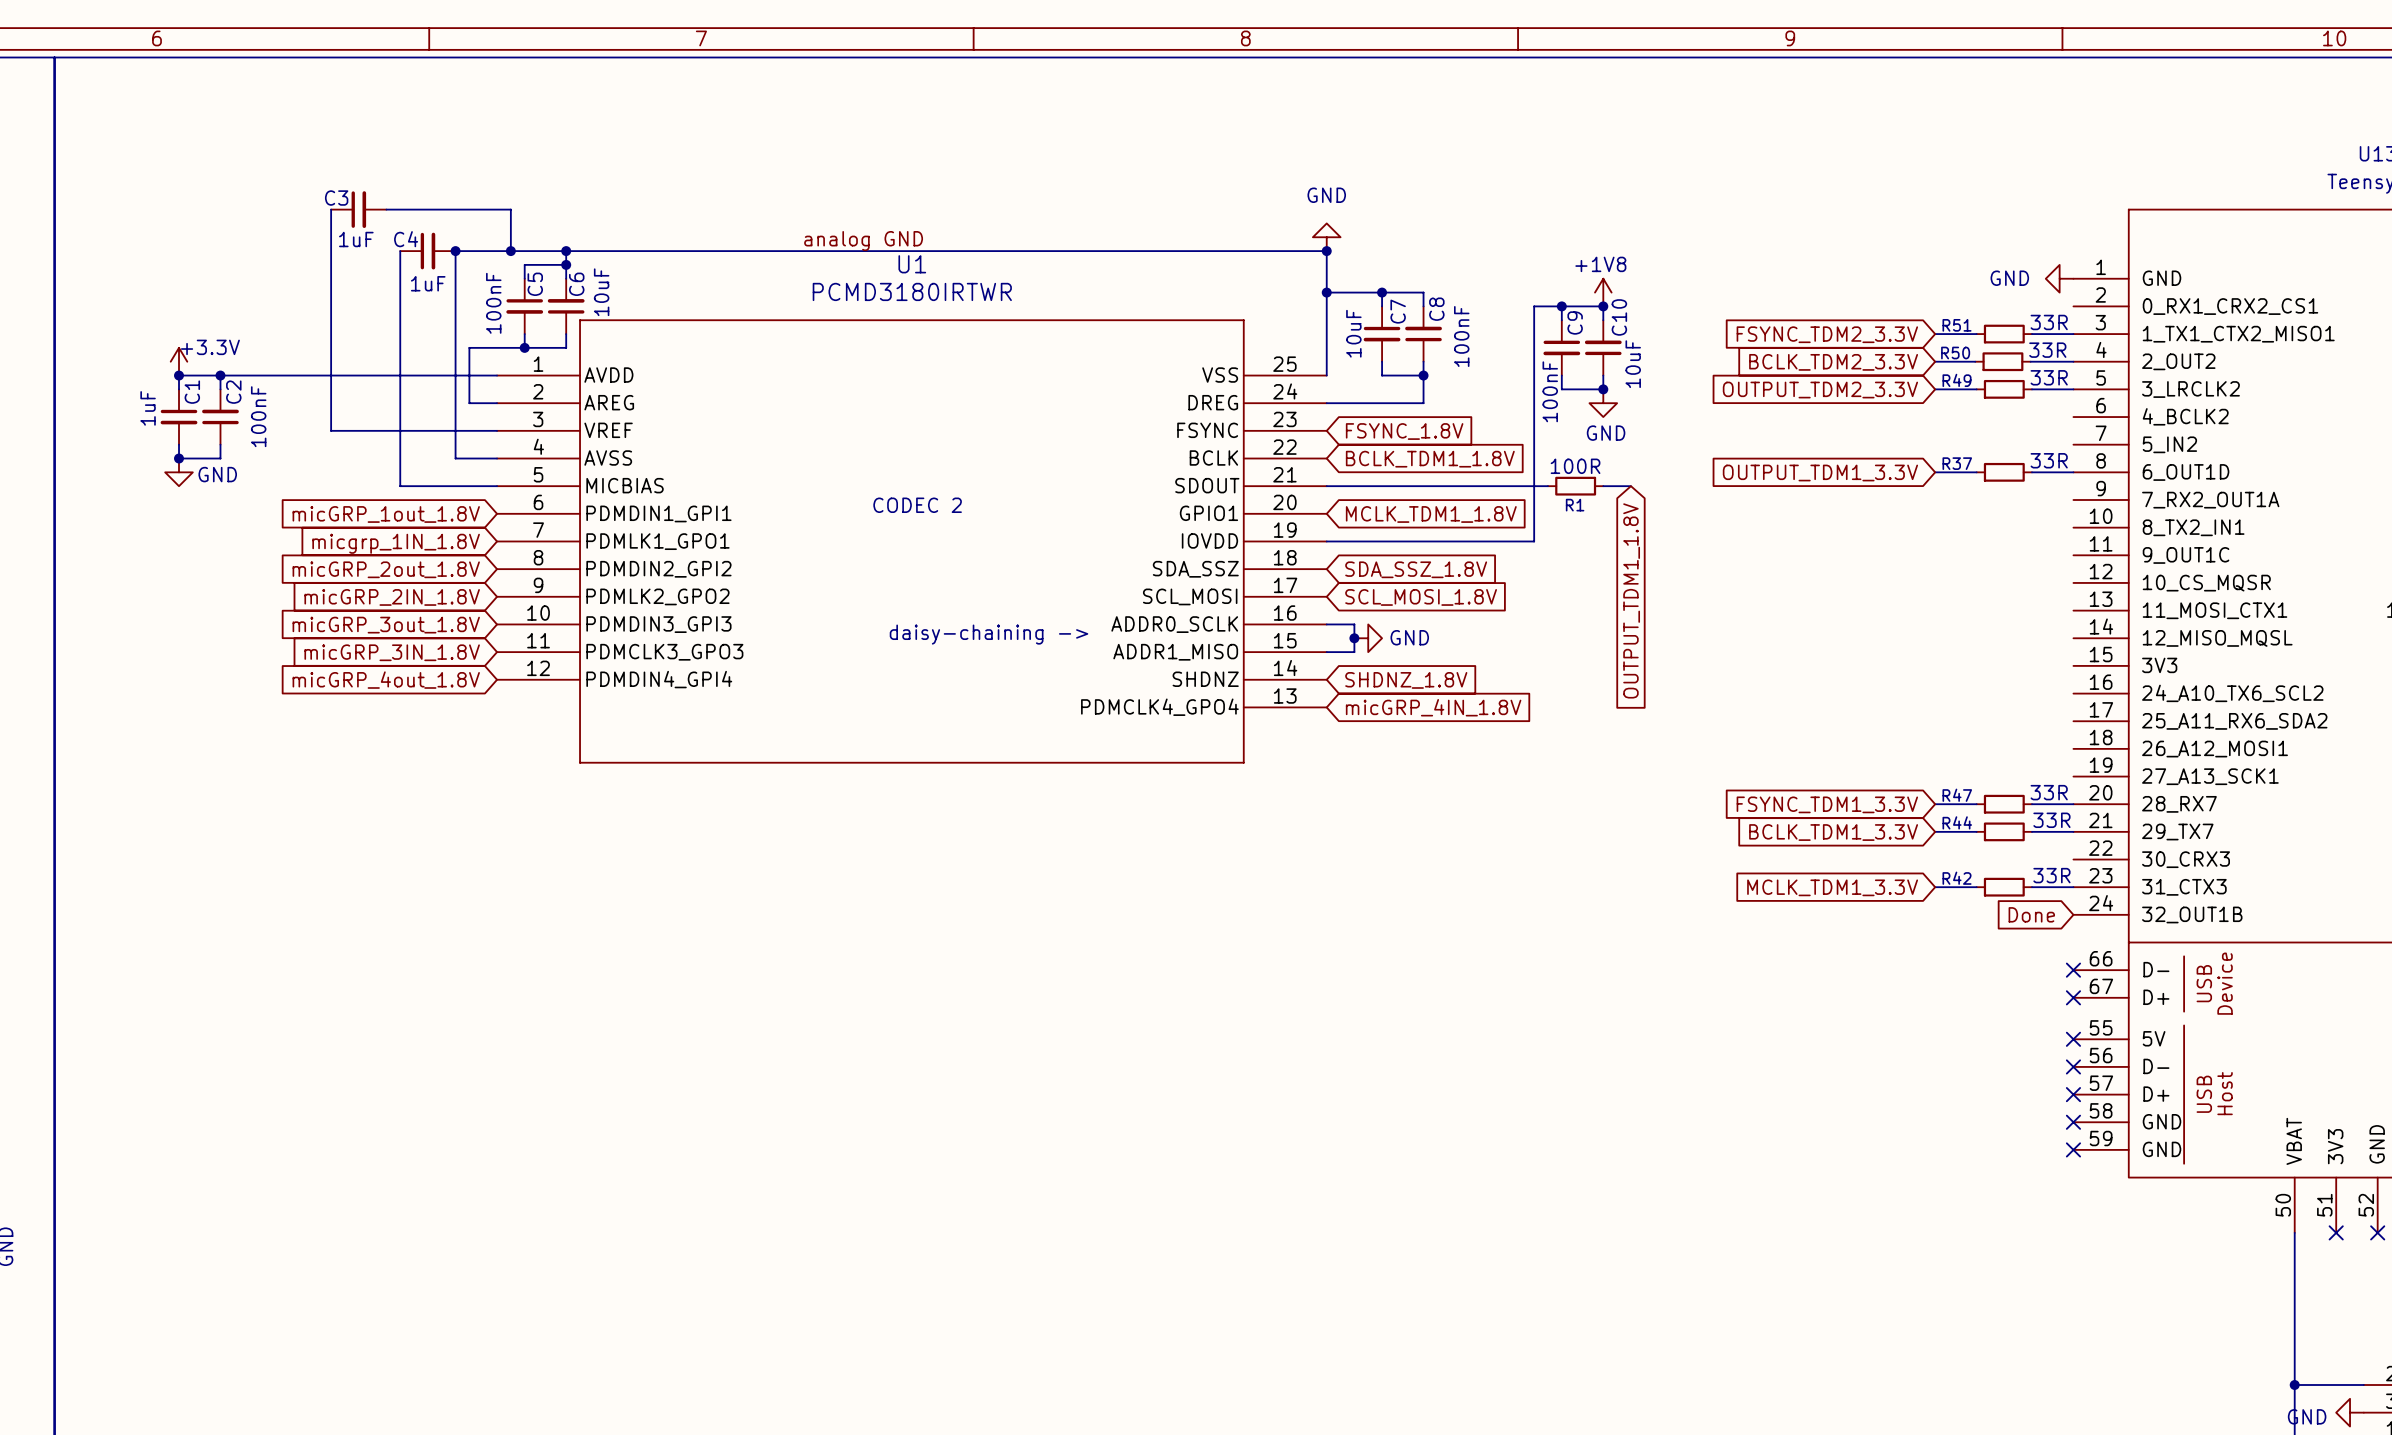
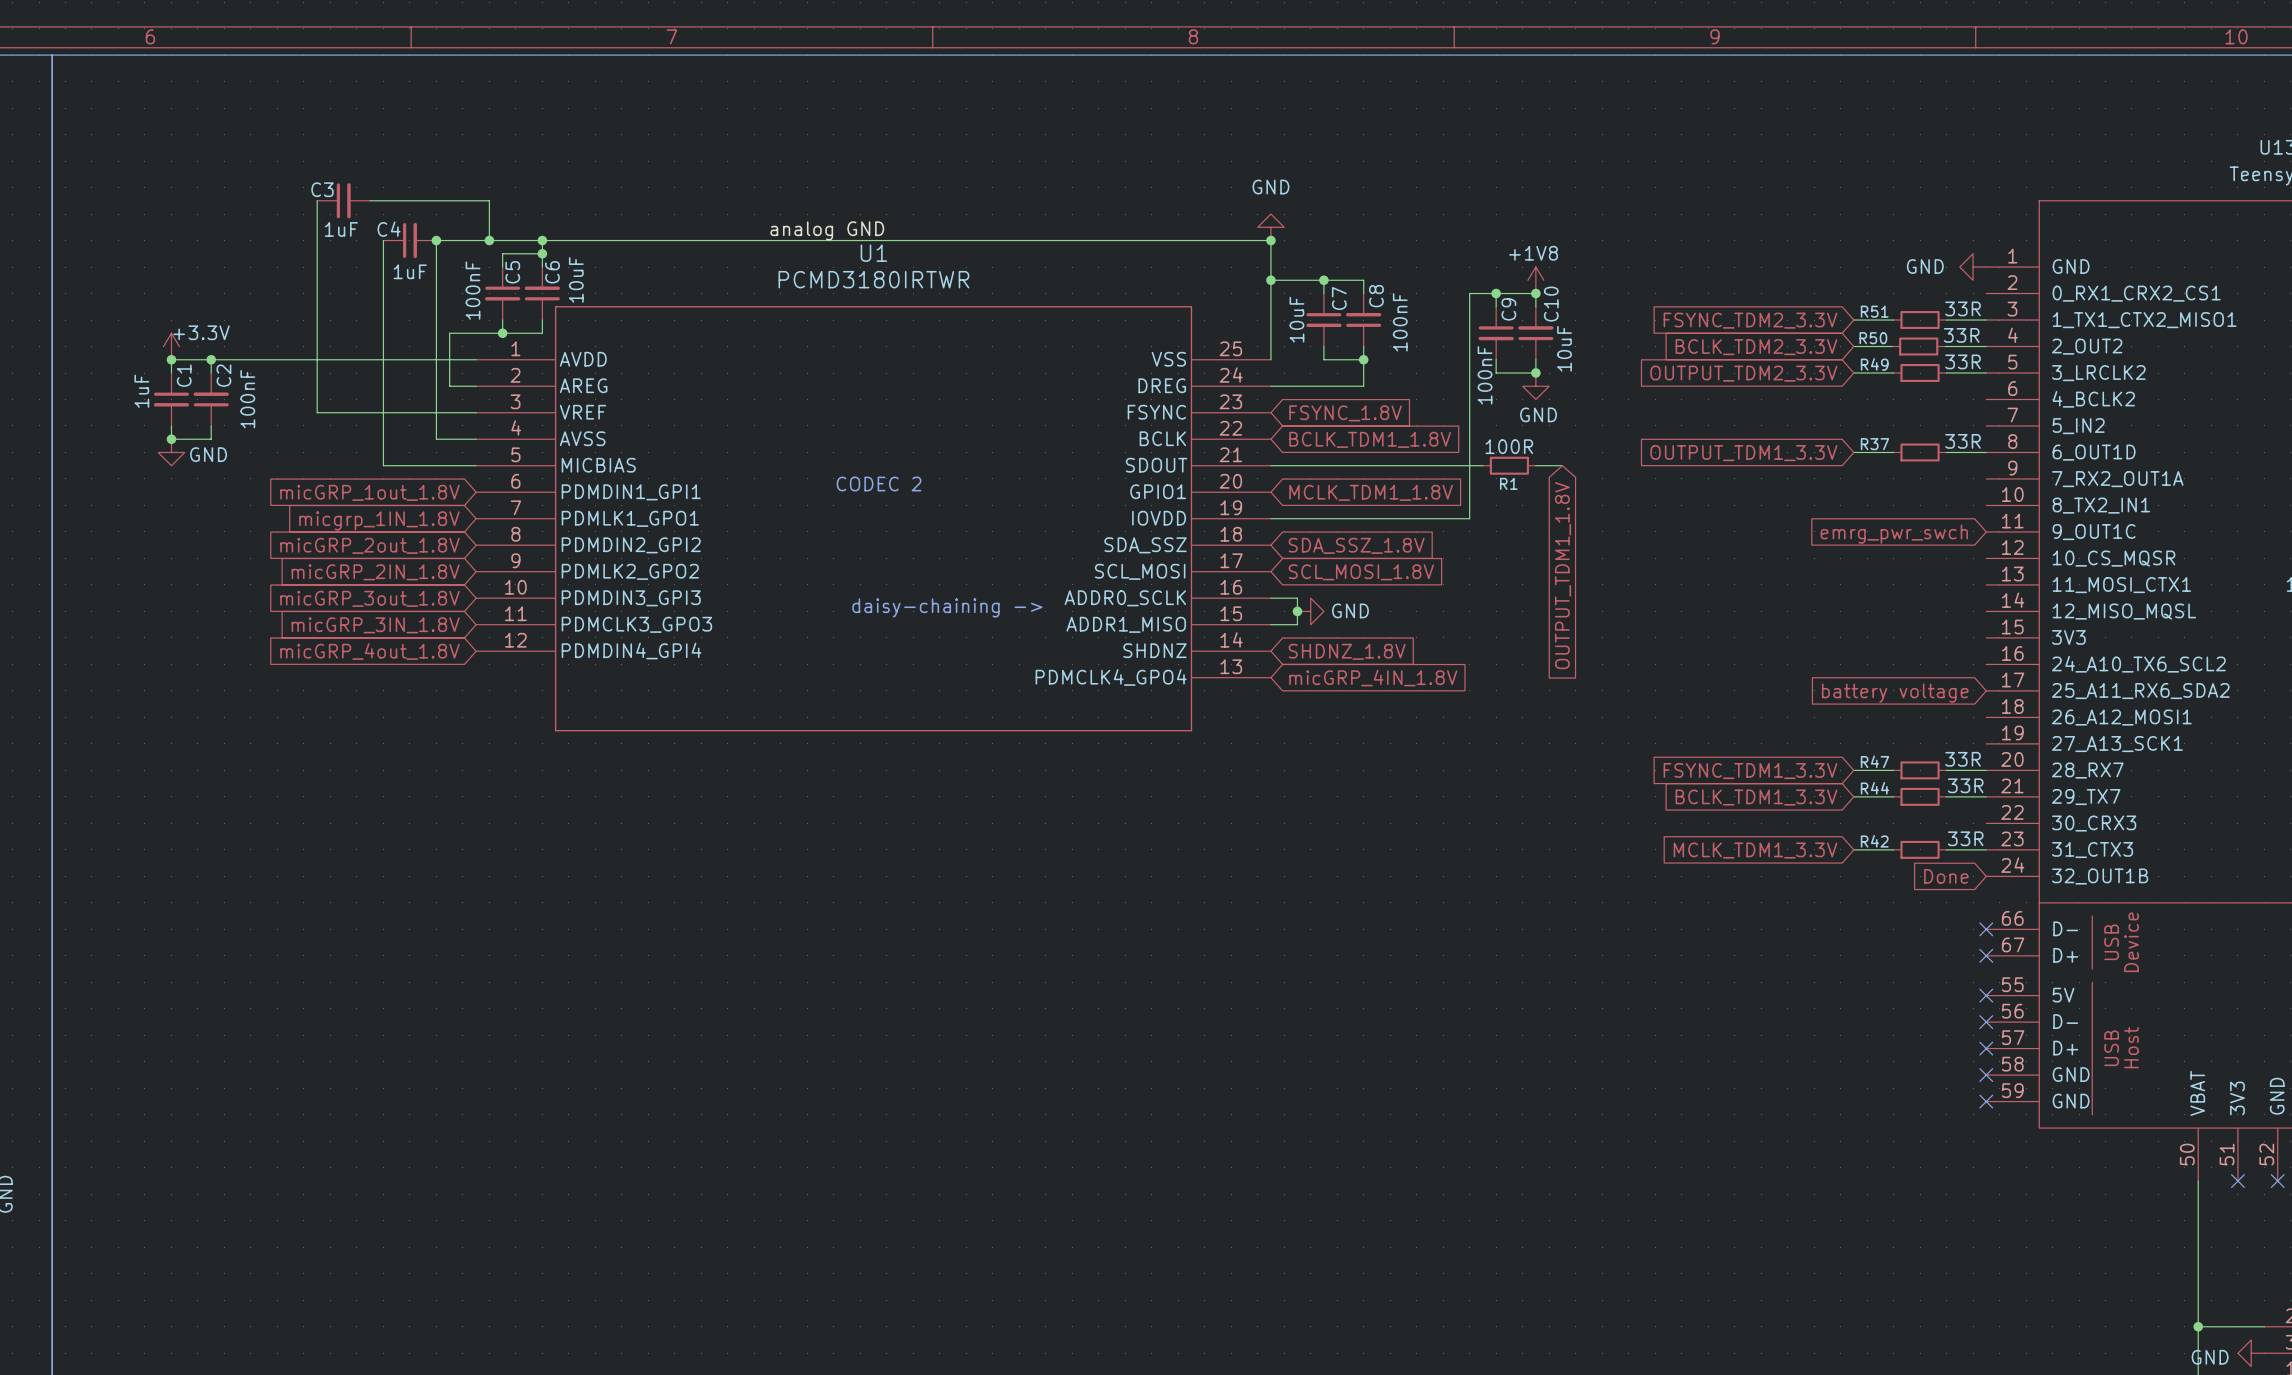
global label: none -> emrg_pwr_swch (1894, 534)
global label: none -> battery voltage (1895, 693)

